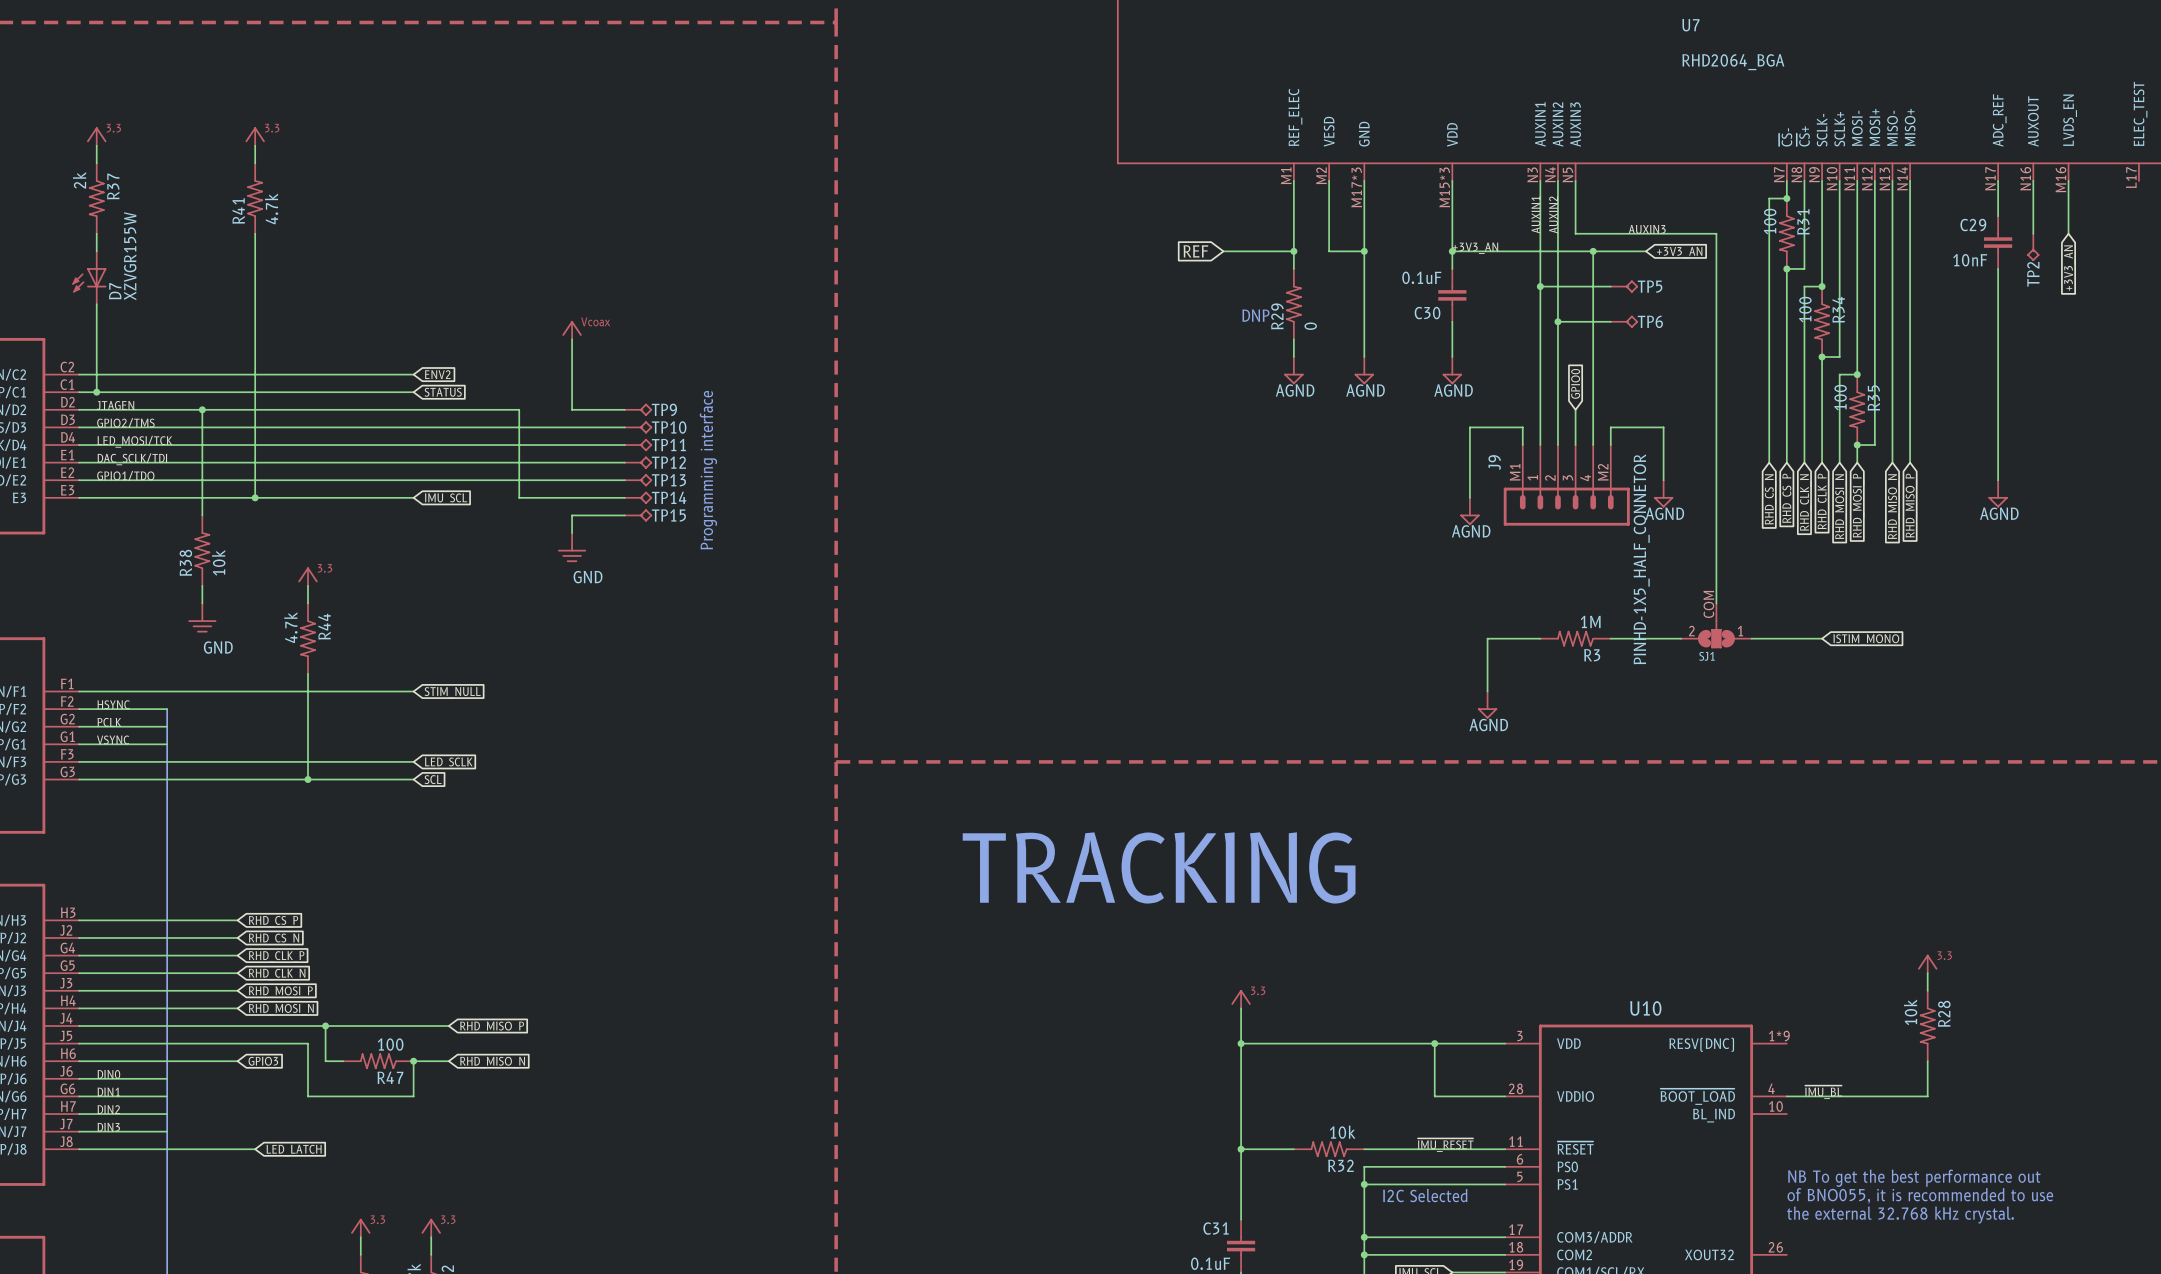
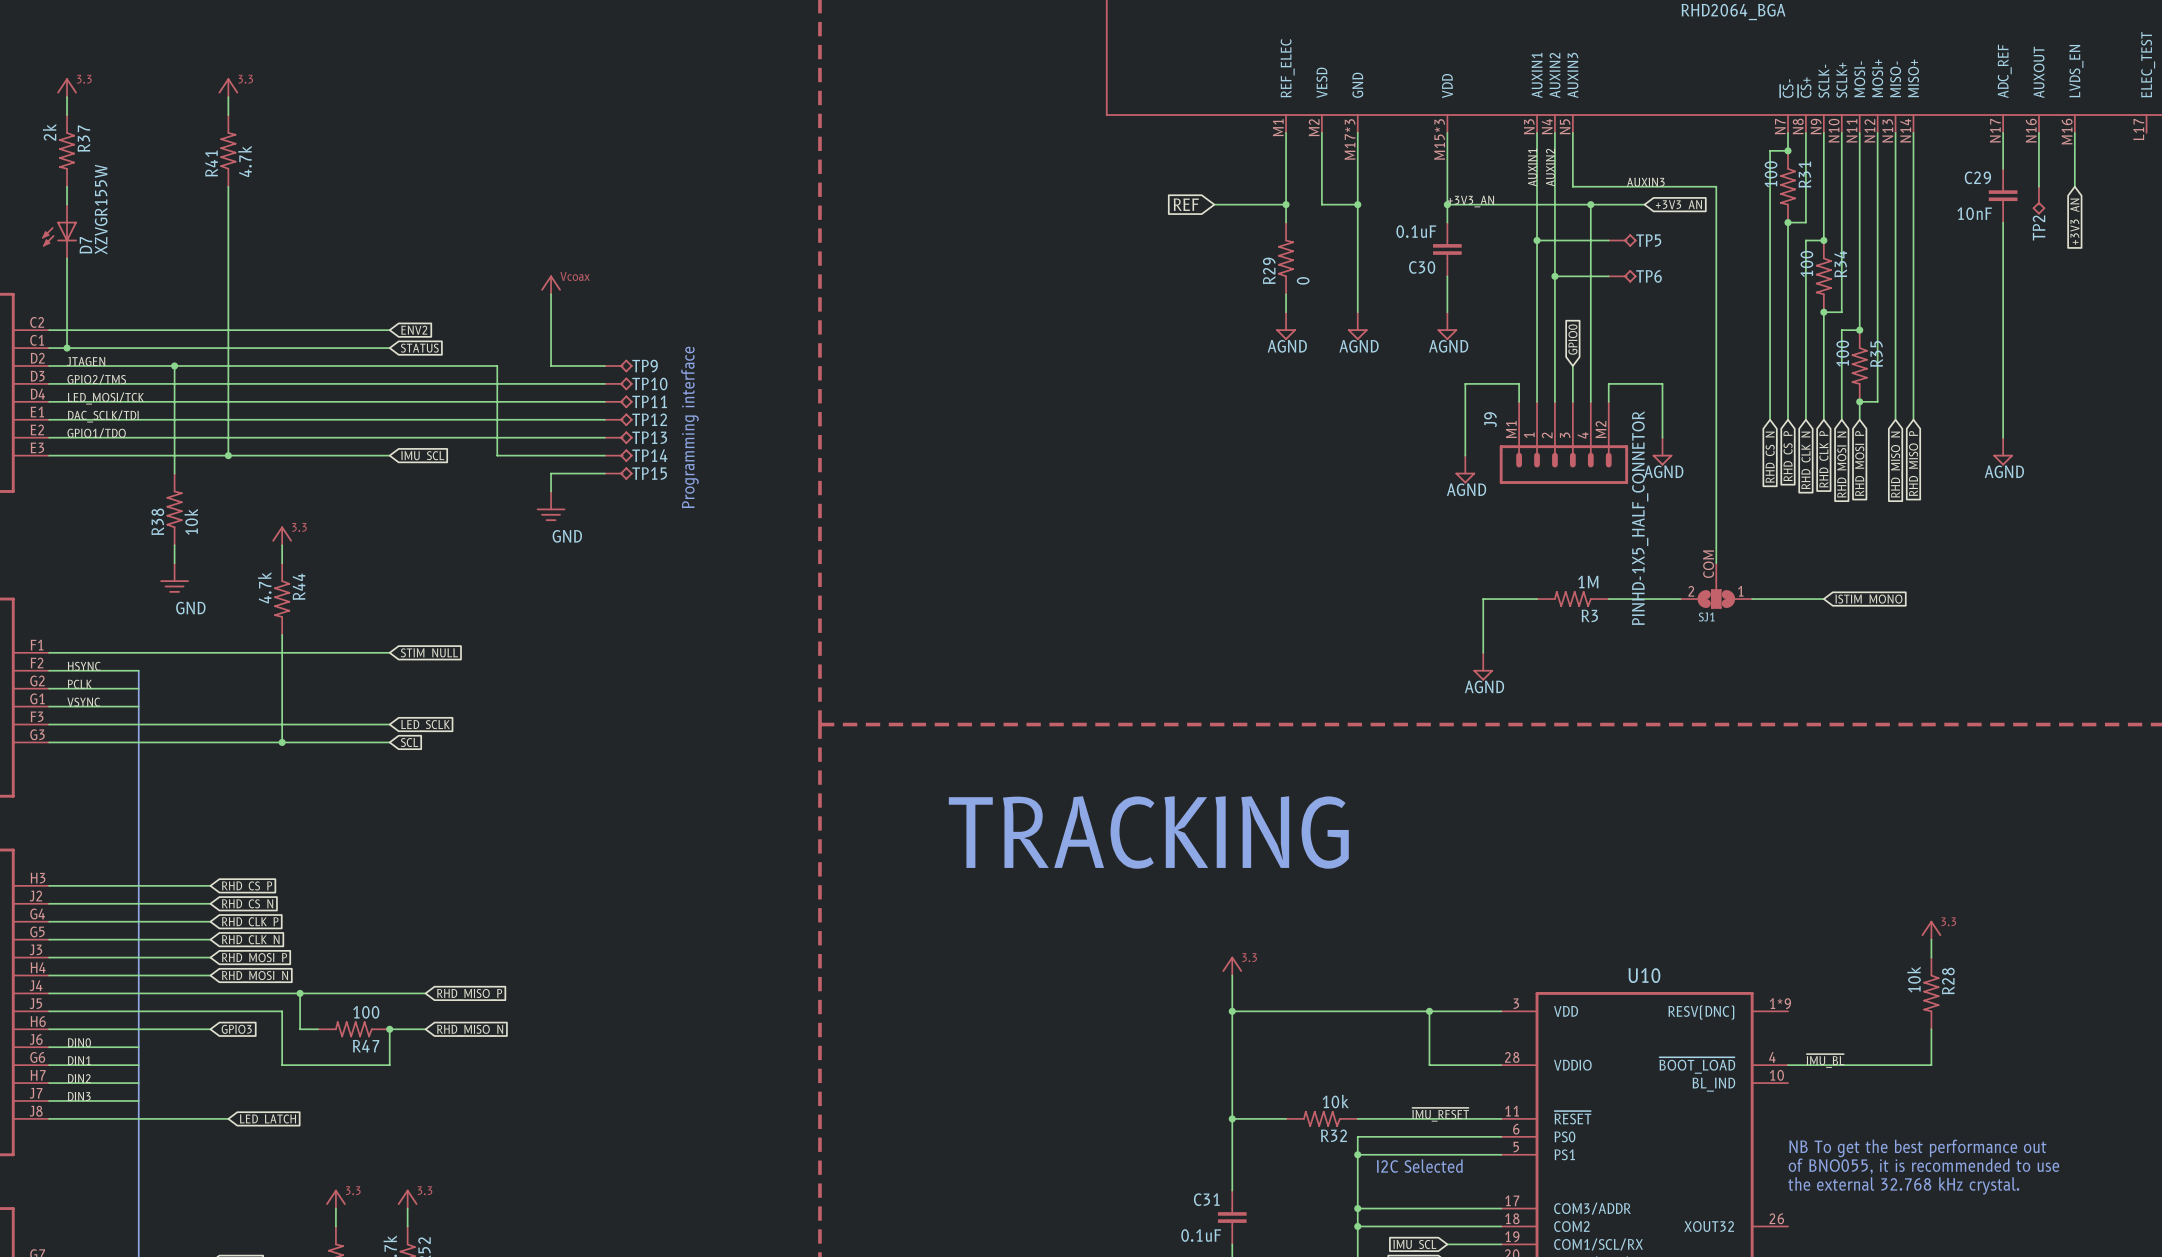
text: DNP (1255, 315) -> none

